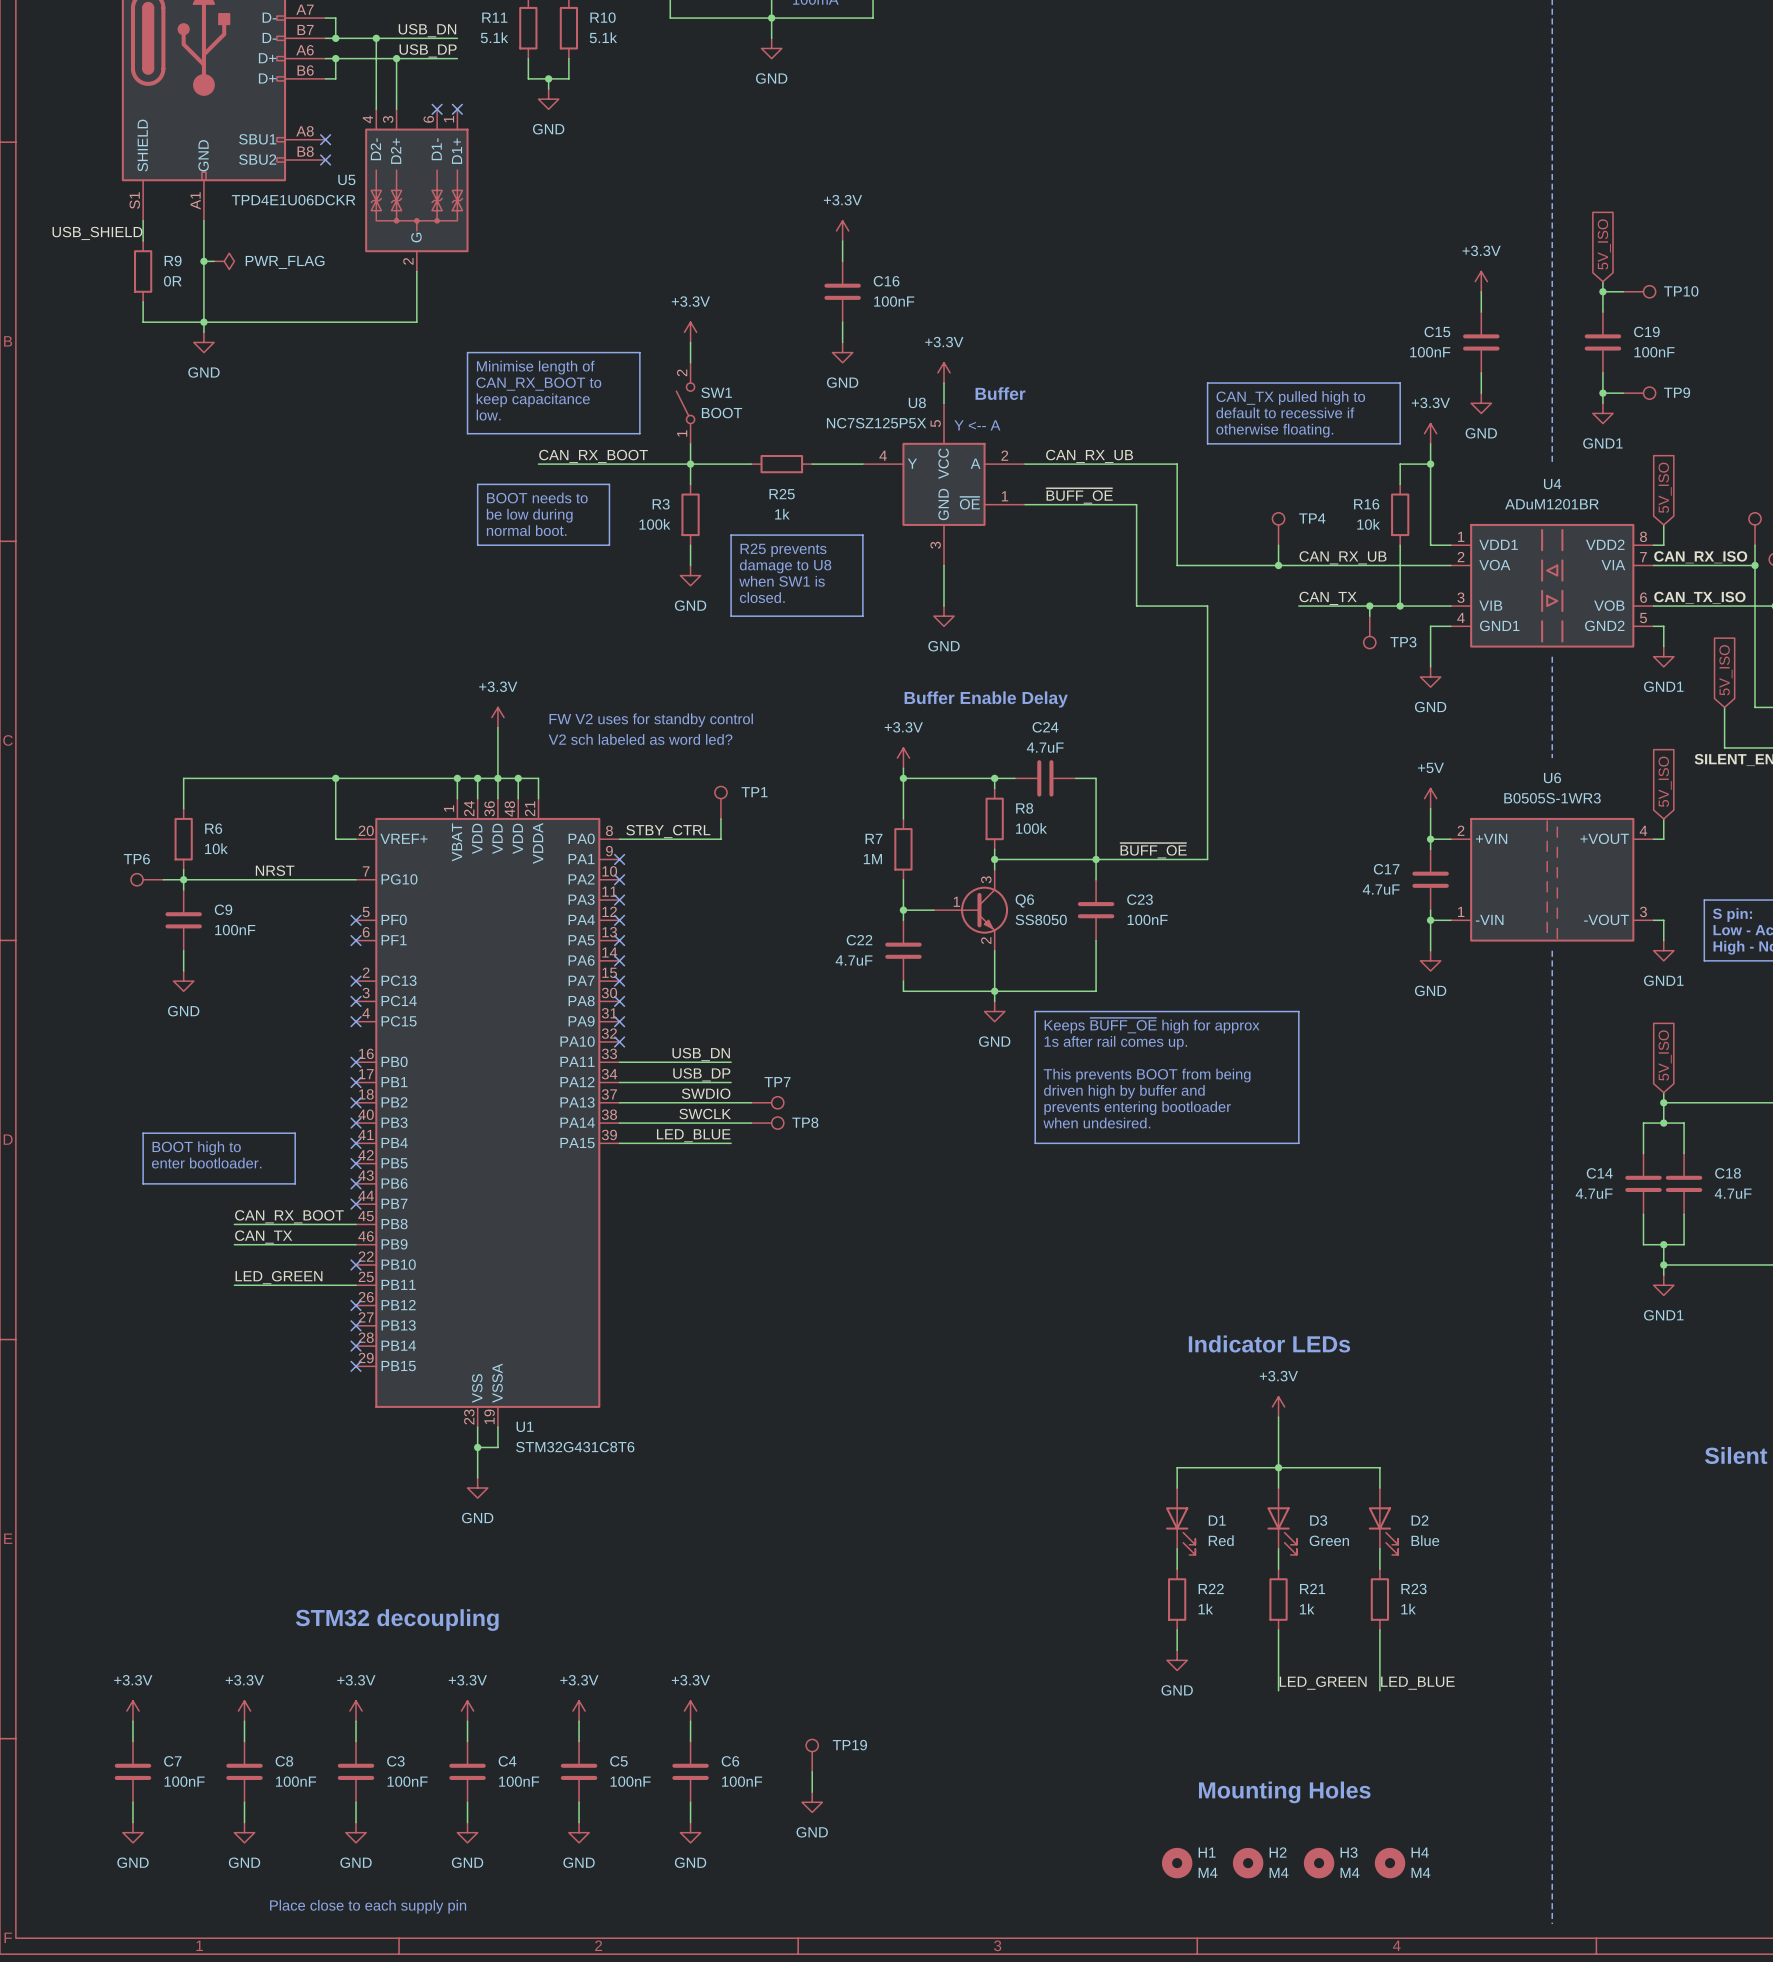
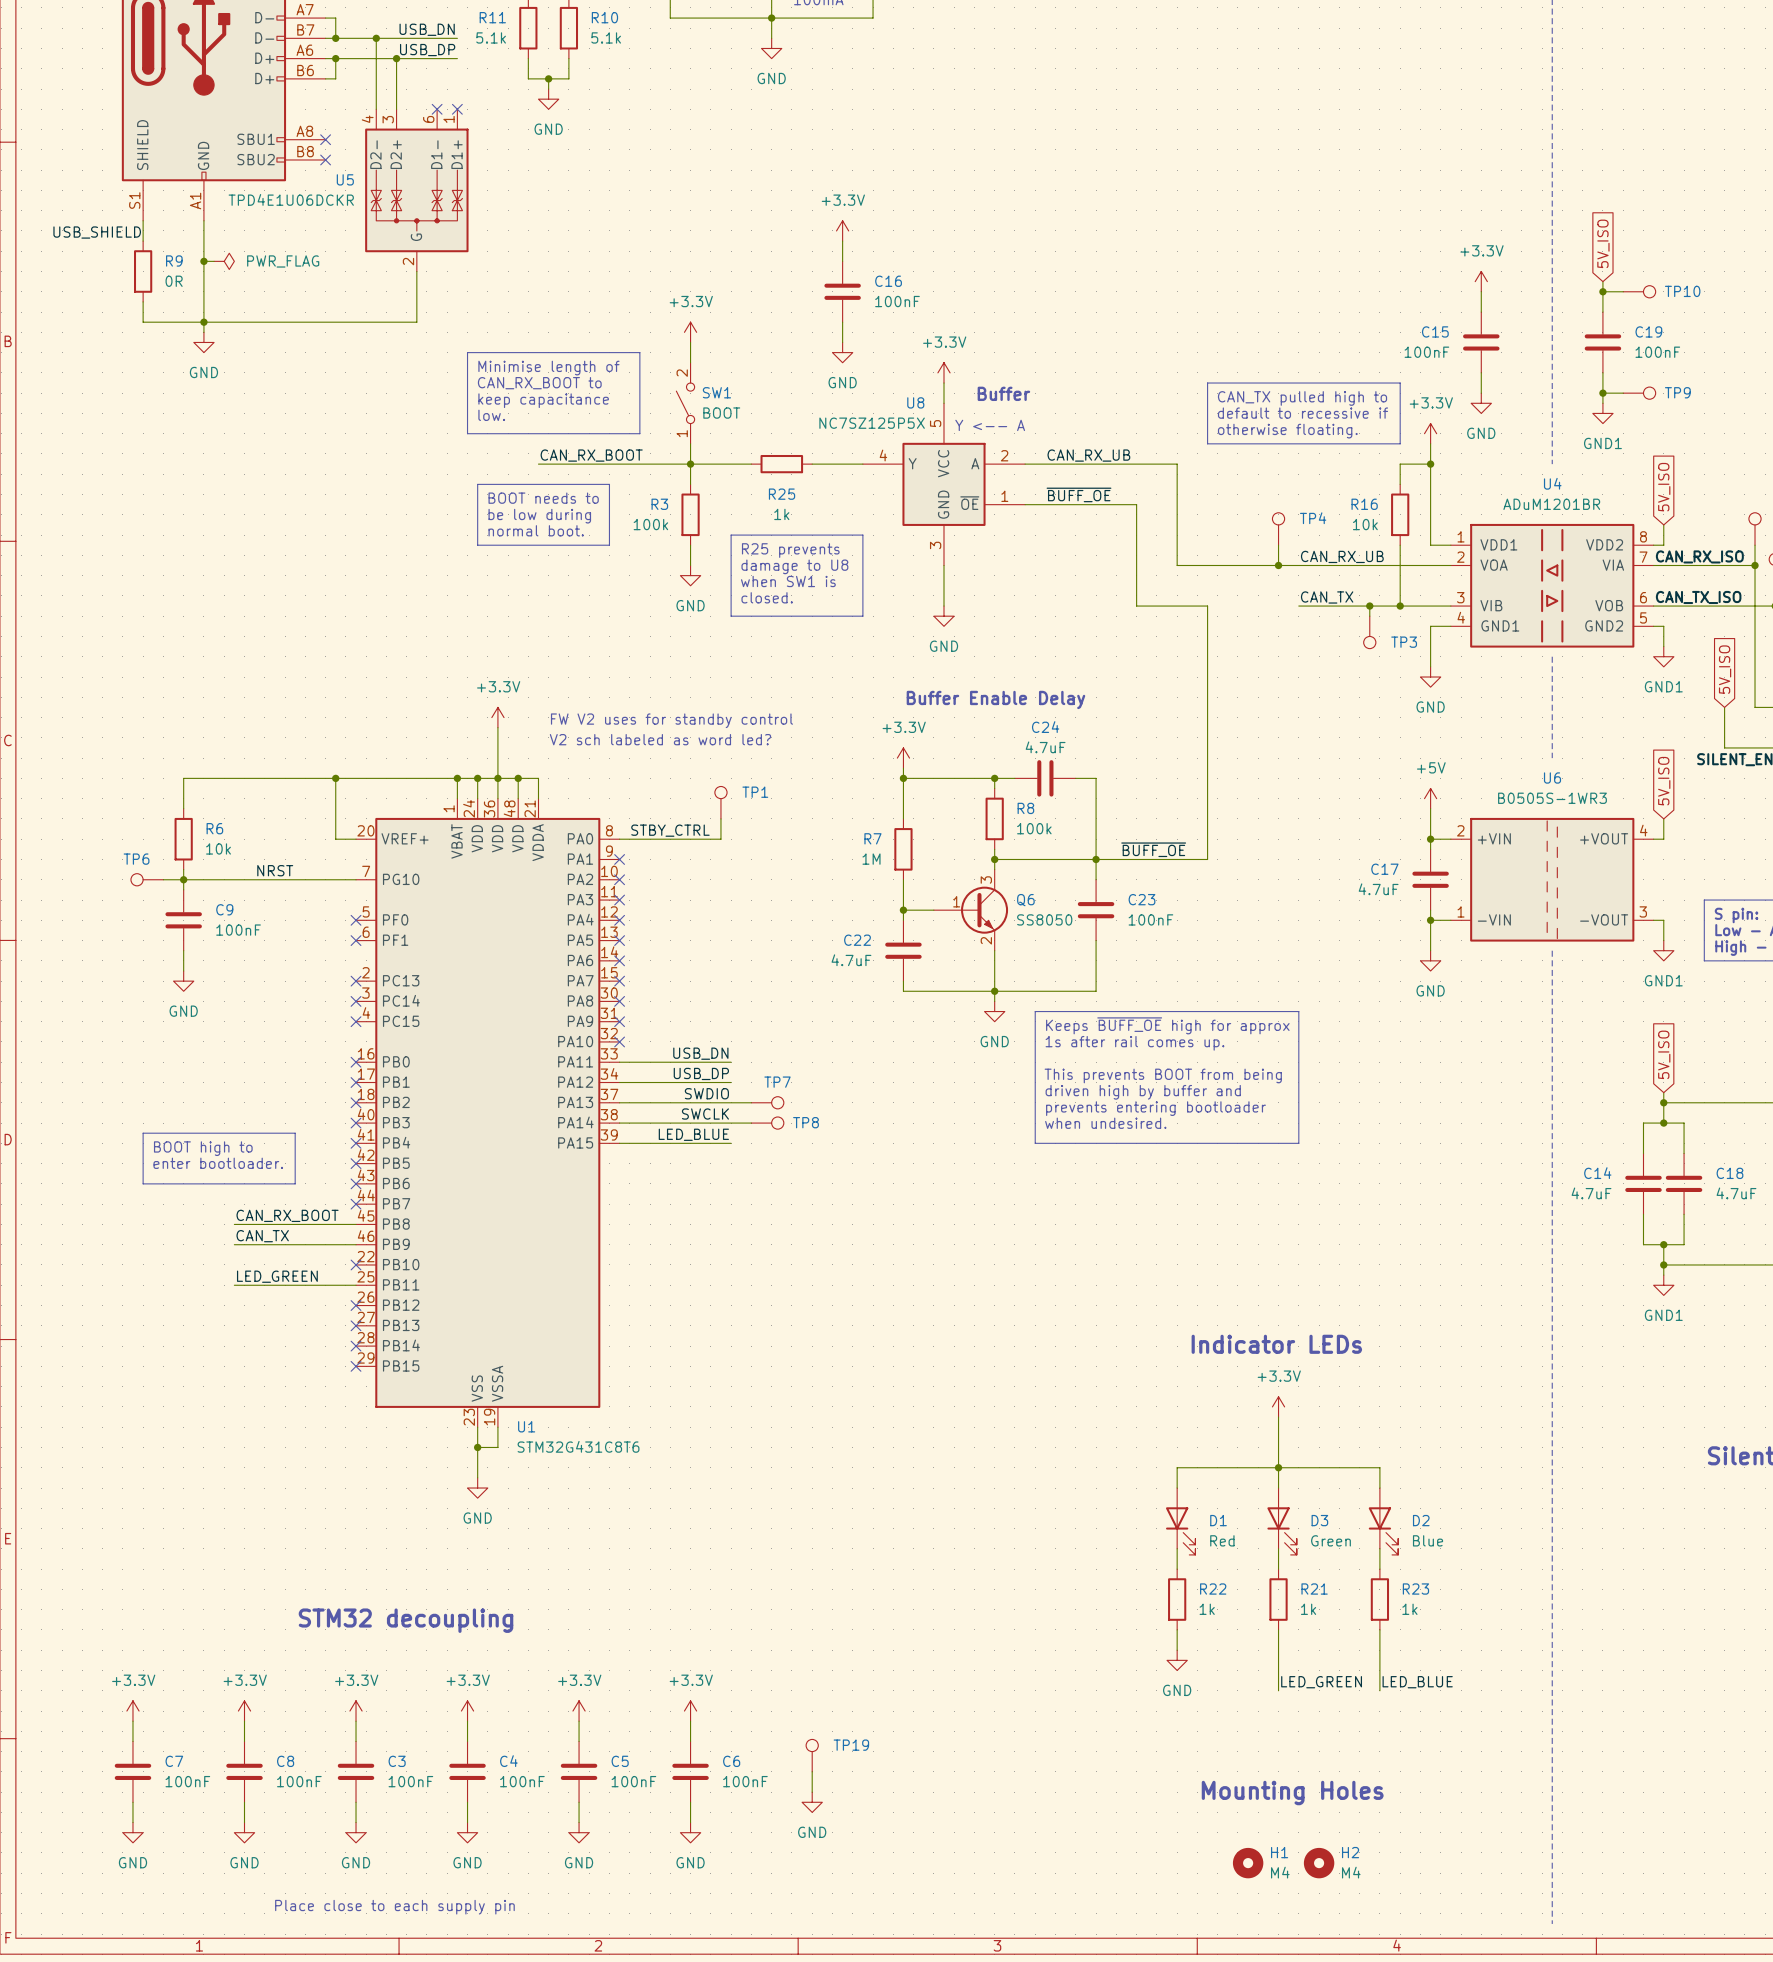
H2 name: H2 (1278, 1852) -> H1 (1279, 1852)
H3 name: H3 (1349, 1852) -> H2 (1350, 1852)
H1: M4 (1177, 1863) -> none
H4: M4 (1390, 1863) -> none

